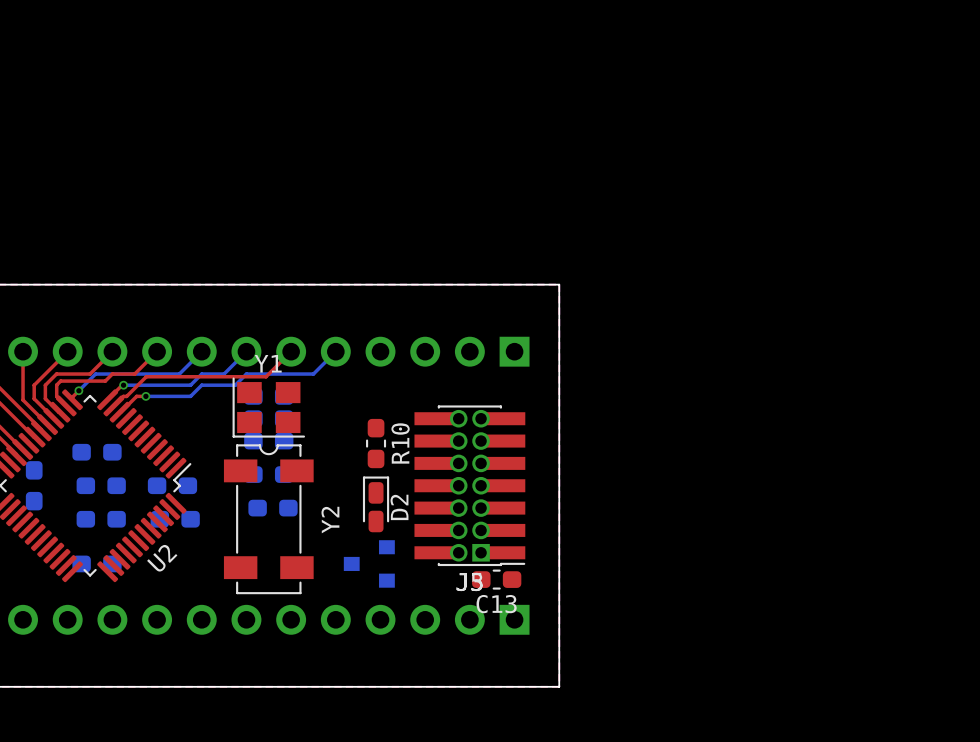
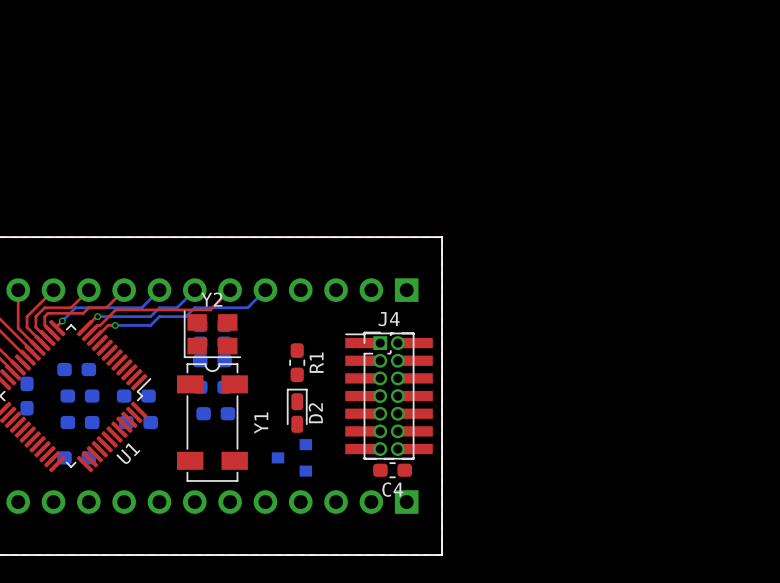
Y1 name: Y1 (268, 363) -> Y2 (211, 299)
R10 name: R10 (400, 443) -> R1 (316, 362)
part: (469, 485) -> none
part: (469, 485) -> none
part: none -> (389, 396)
J4: none -> (389, 395)
Y2 name: Y2 (330, 520) -> Y1 (261, 423)
U2 name: U2 (162, 558) -> U1 (128, 453)
C13 name: C13 (496, 604) -> C4 (392, 489)

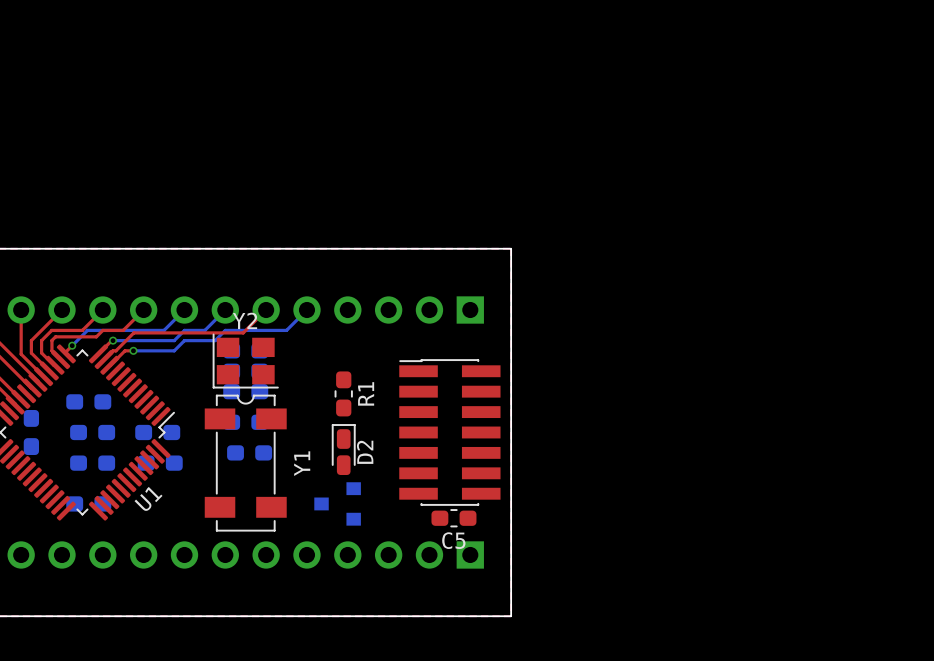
J4: (389, 395) -> none
C4 name: C4 (392, 489) -> C5 (453, 540)

